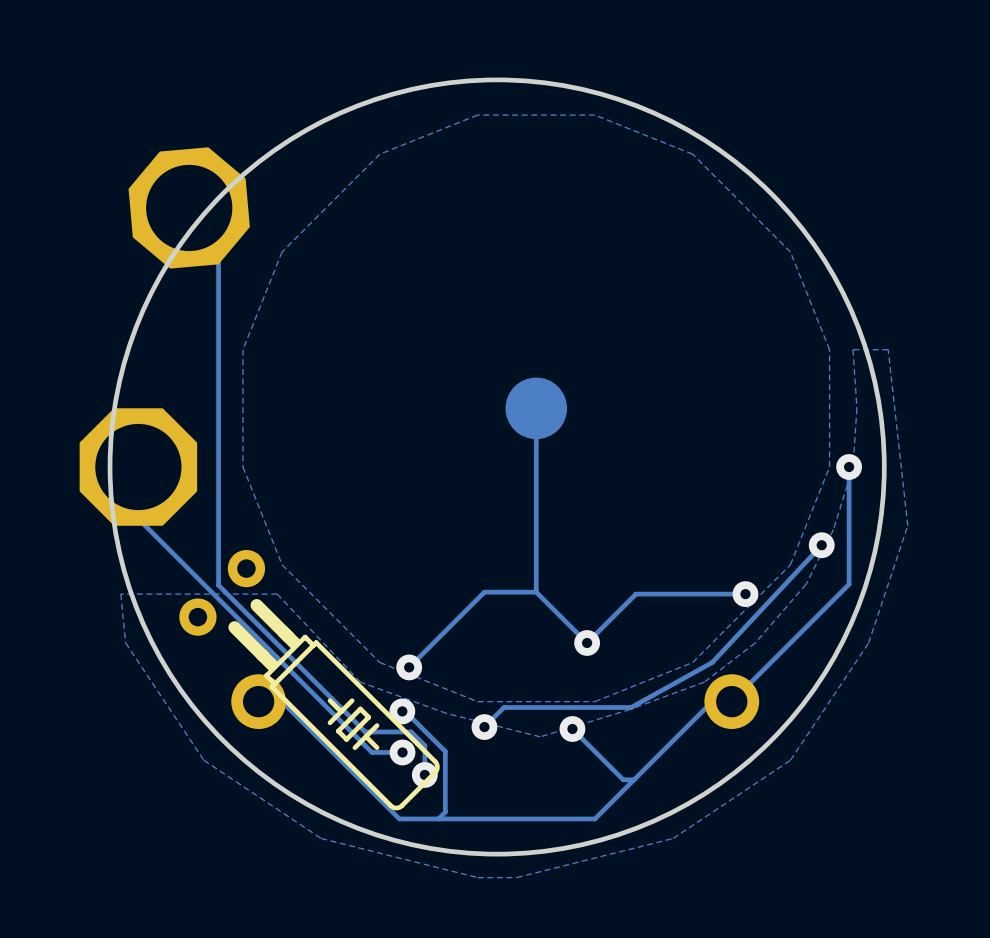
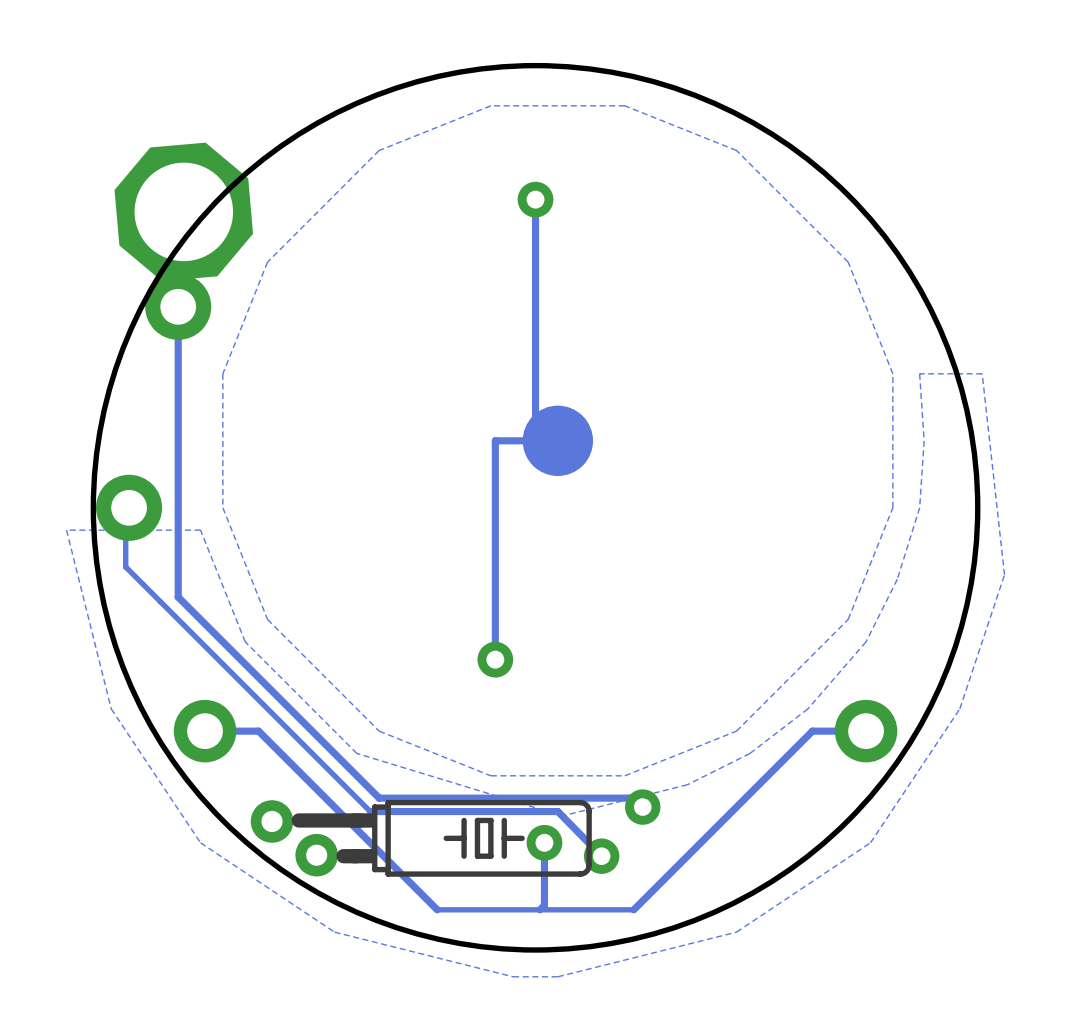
zone outline: (477, 115) (379, 154) (282, 251) (242, 349) (242, 467) (282, 564) (379, 662) (477, 701) -> (513, 105) (490, 105) (379, 150) (267, 262) (222, 373) (222, 507) (267, 619) (379, 731) (490, 775) (513, 775)
zone outline: (575, 115) (594, 115) (692, 154) (790, 251) (829, 349) (829, 467) (790, 564) (692, 662) (594, 701) (575, 701) -> (624, 105) (736, 150) (848, 262) (892, 373) (892, 507) (848, 619) (736, 731) (624, 775)
track: none -> (535, 199) (535, 418) (557, 440) (495, 440) (495, 659)
via: none -> (535, 199)
track: (189, 207) (218, 237) (218, 585) (365, 731) (411, 731) (424, 745) (424, 774) -> none
track: none -> (178, 306) (178, 597) (379, 798) (629, 798) (642, 807)
part: none -> (178, 306)
zone outline: (853, 349) (856, 408) (853, 467) (833, 529) (806, 584) (755, 642) (704, 682) (630, 709) (540, 736) (446, 713) (360, 682) (277, 594) (120, 594) (125, 642) -> (941, 373) (919, 373) (924, 440) (919, 507) (897, 579) (866, 641) (808, 708) (749, 753) (687, 784) (562, 816) (356, 753) (245, 641) (200, 530) (66, 530) (111, 708)
part footprint: [79, 408, 198, 526] -> [96, 474, 163, 541]
track: (536, 408) (536, 592) -> none
part position: (536, 408) -> (557, 440)
track: (849, 467) (849, 584) (731, 701) (712, 701) (594, 818) (583, 818) -> (866, 731) (812, 731) (633, 909)
via: (849, 467) -> none
track: (821, 545) (712, 662) (631, 707) (504, 707) (484, 727) -> none
via: (821, 545) -> none
track: (536, 592) (484, 592) (409, 667) -> none
track: (536, 592) (587, 642) (635, 594) (745, 594) -> none
via: (745, 594) -> none
via: none -> (495, 659)
via: (587, 642) -> none
via: (409, 667) -> none
part: (309, 680) -> none
track: (258, 701) (282, 701) (399, 818) (411, 818) -> (205, 731) (258, 731) (437, 909)
part position: (258, 701) -> (205, 731)
part position: (731, 701) -> (866, 731)
track: (402, 711) (405, 711) (445, 751) (445, 812) (438, 818) -> none
via: (402, 711) -> none
via: (484, 727) -> none
track: (572, 729) (623, 779) (634, 779) -> none
via position: (572, 729) -> (642, 807)
track: (352, 732) (372, 752) (402, 752) -> (370, 811) (557, 811) (601, 856)
via: (402, 752) -> none
part: none -> (421, 838)
track: none -> (544, 842) (544, 905) (540, 909)
via: none -> (544, 842)
via: none -> (601, 856)
via: (424, 774) -> none

